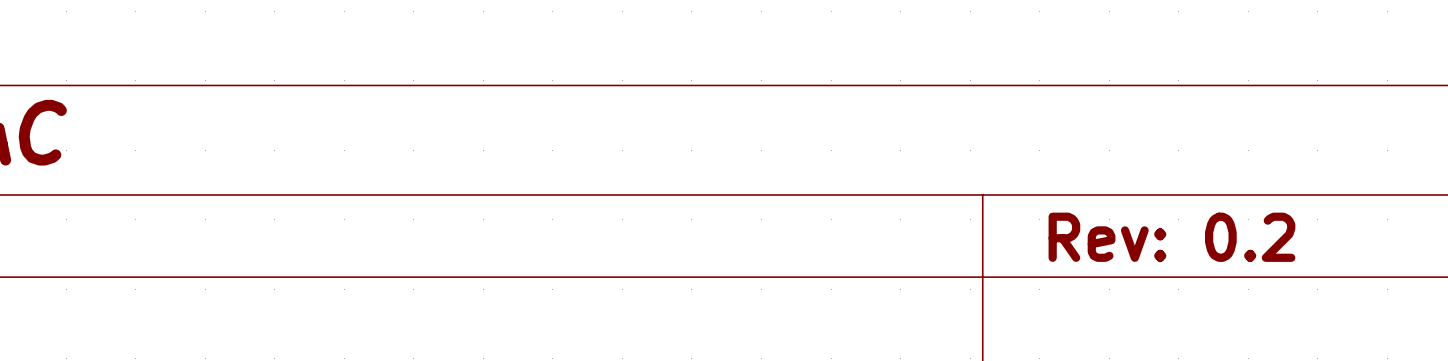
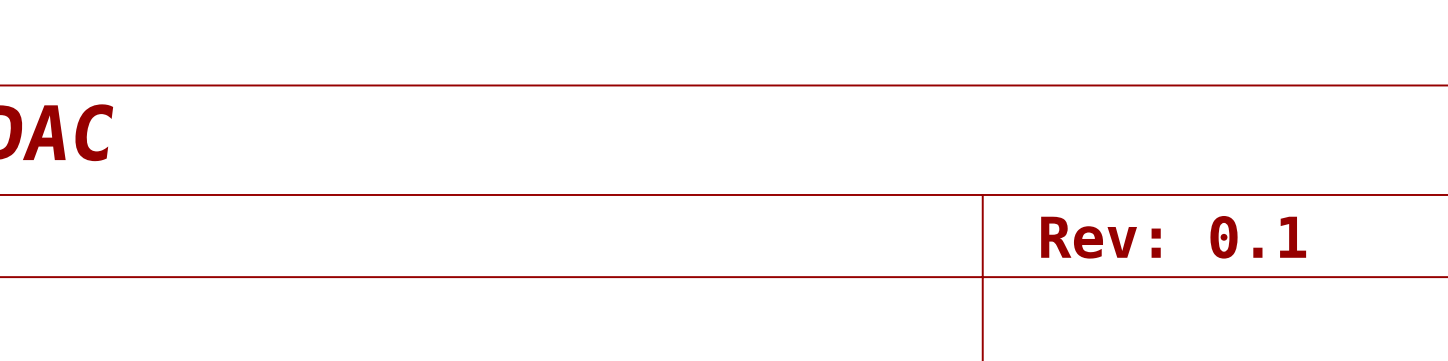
title block: Rev: 0.2 (1171, 237) -> Rev: 0.1 (1173, 237)

